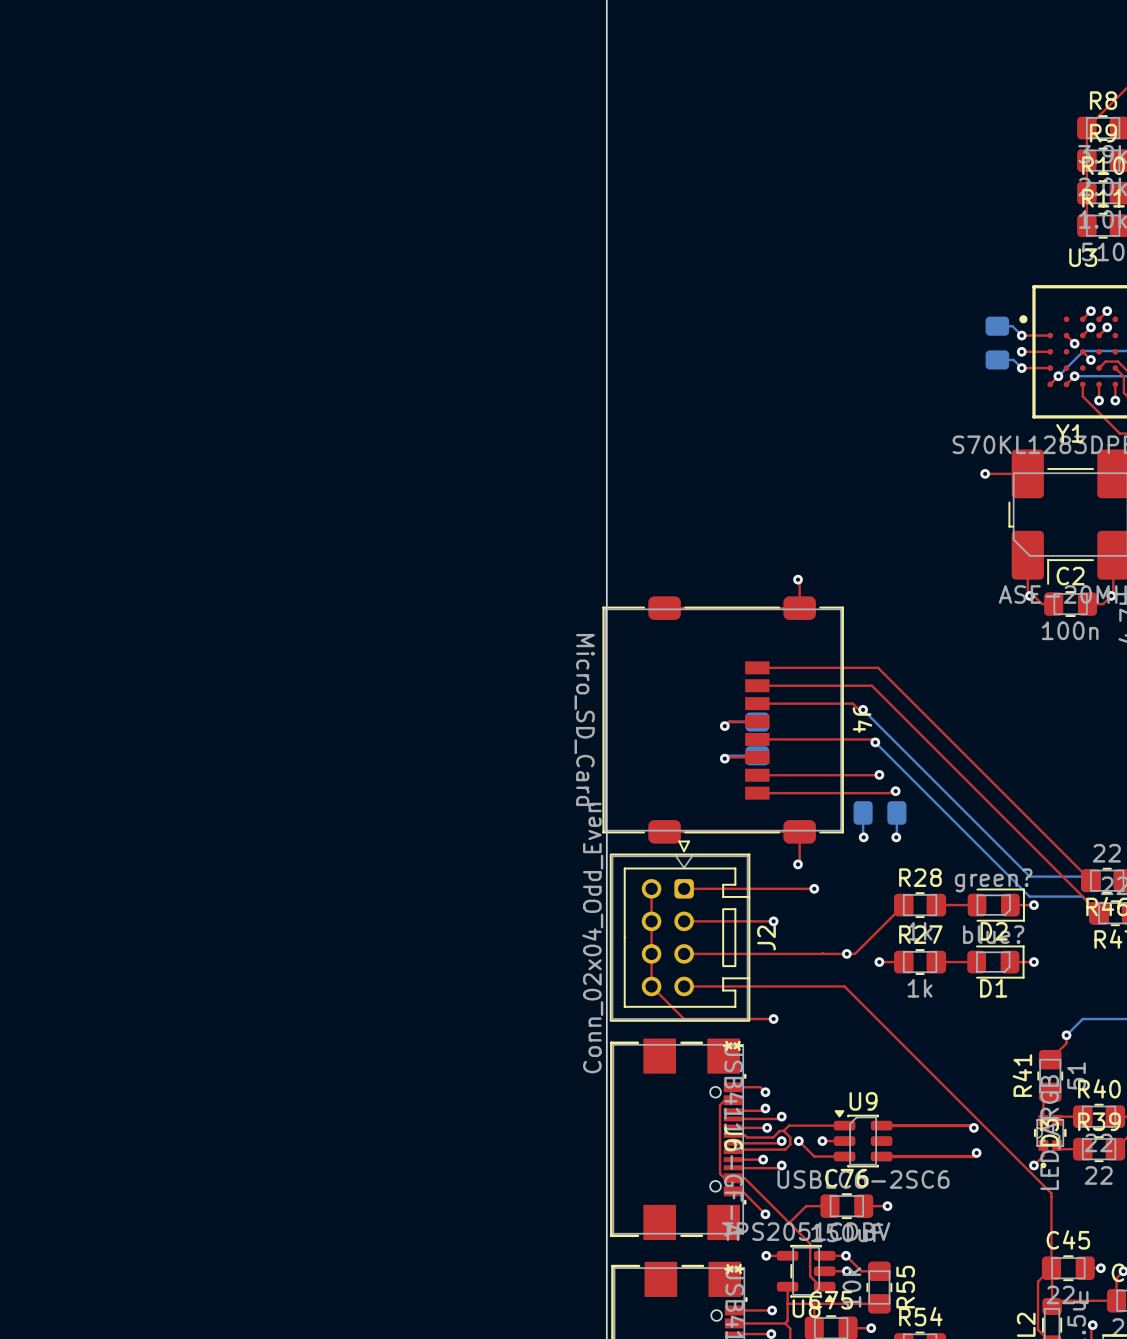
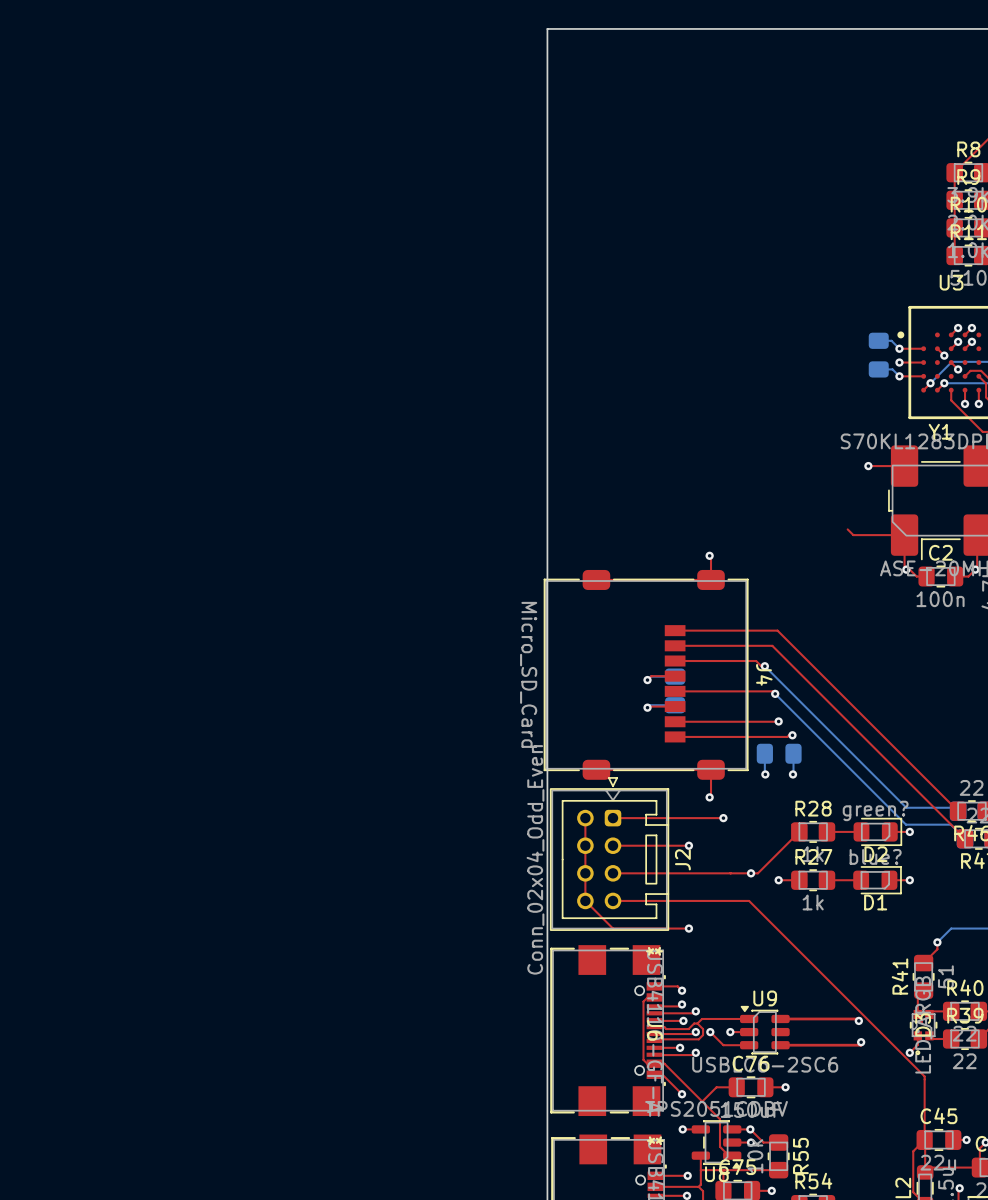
top track: none -> (847, 529) (853, 535) (904, 535)

